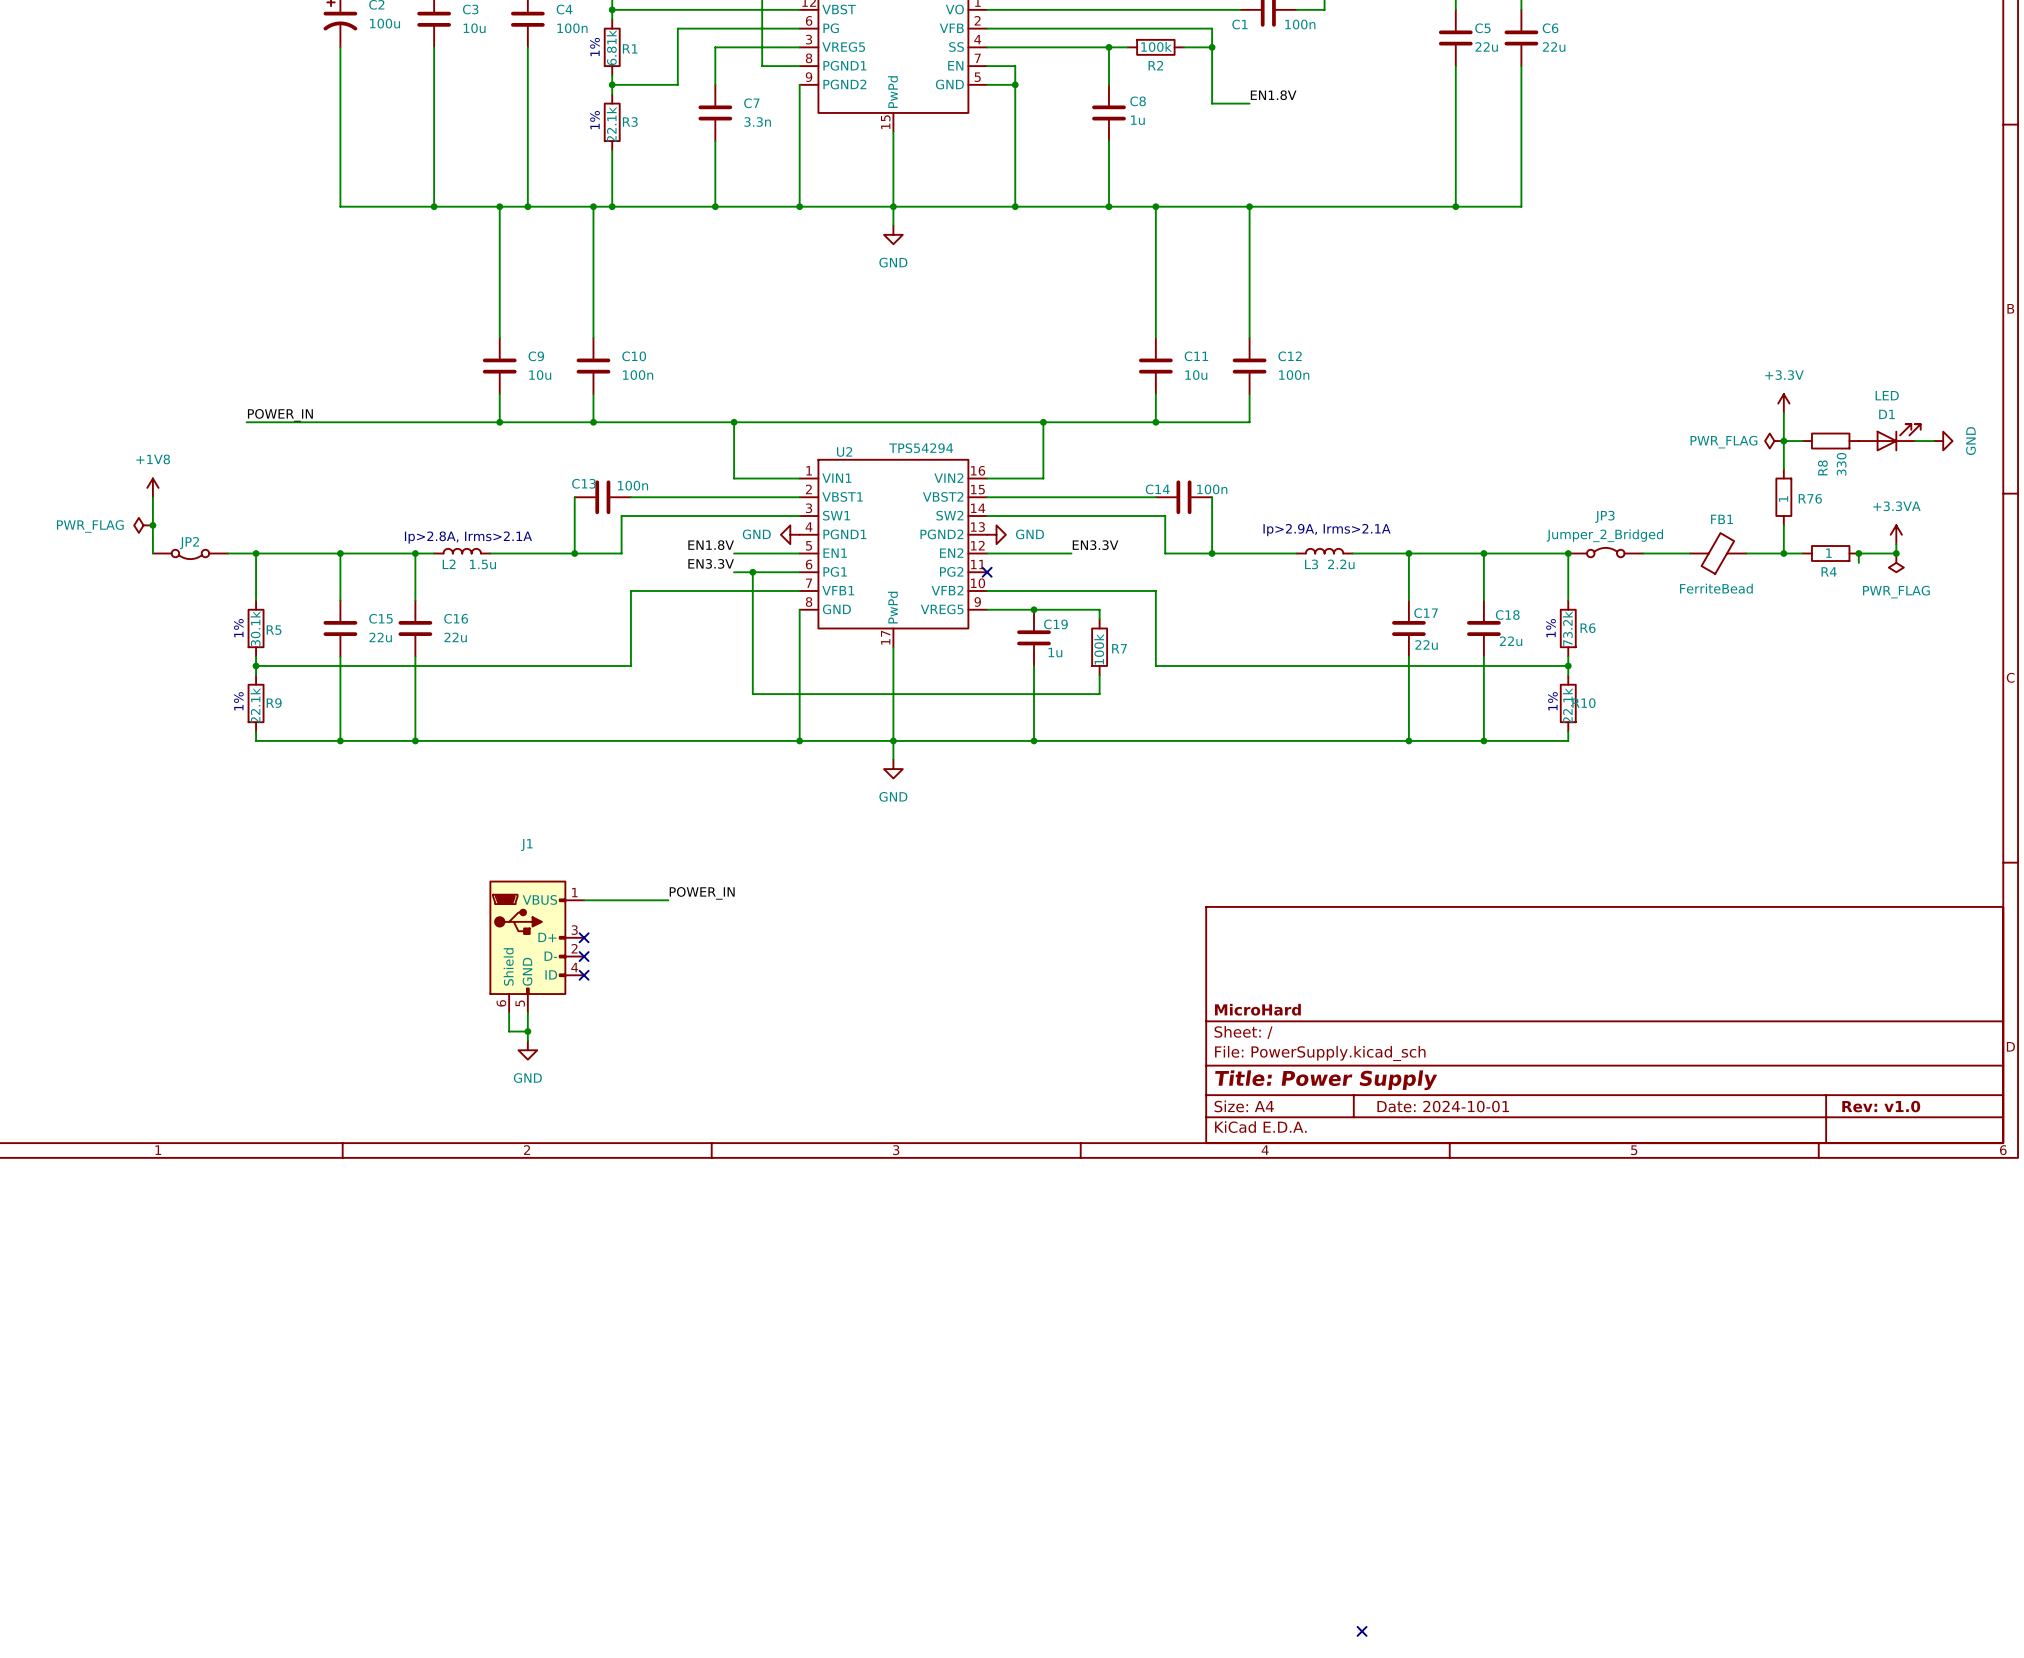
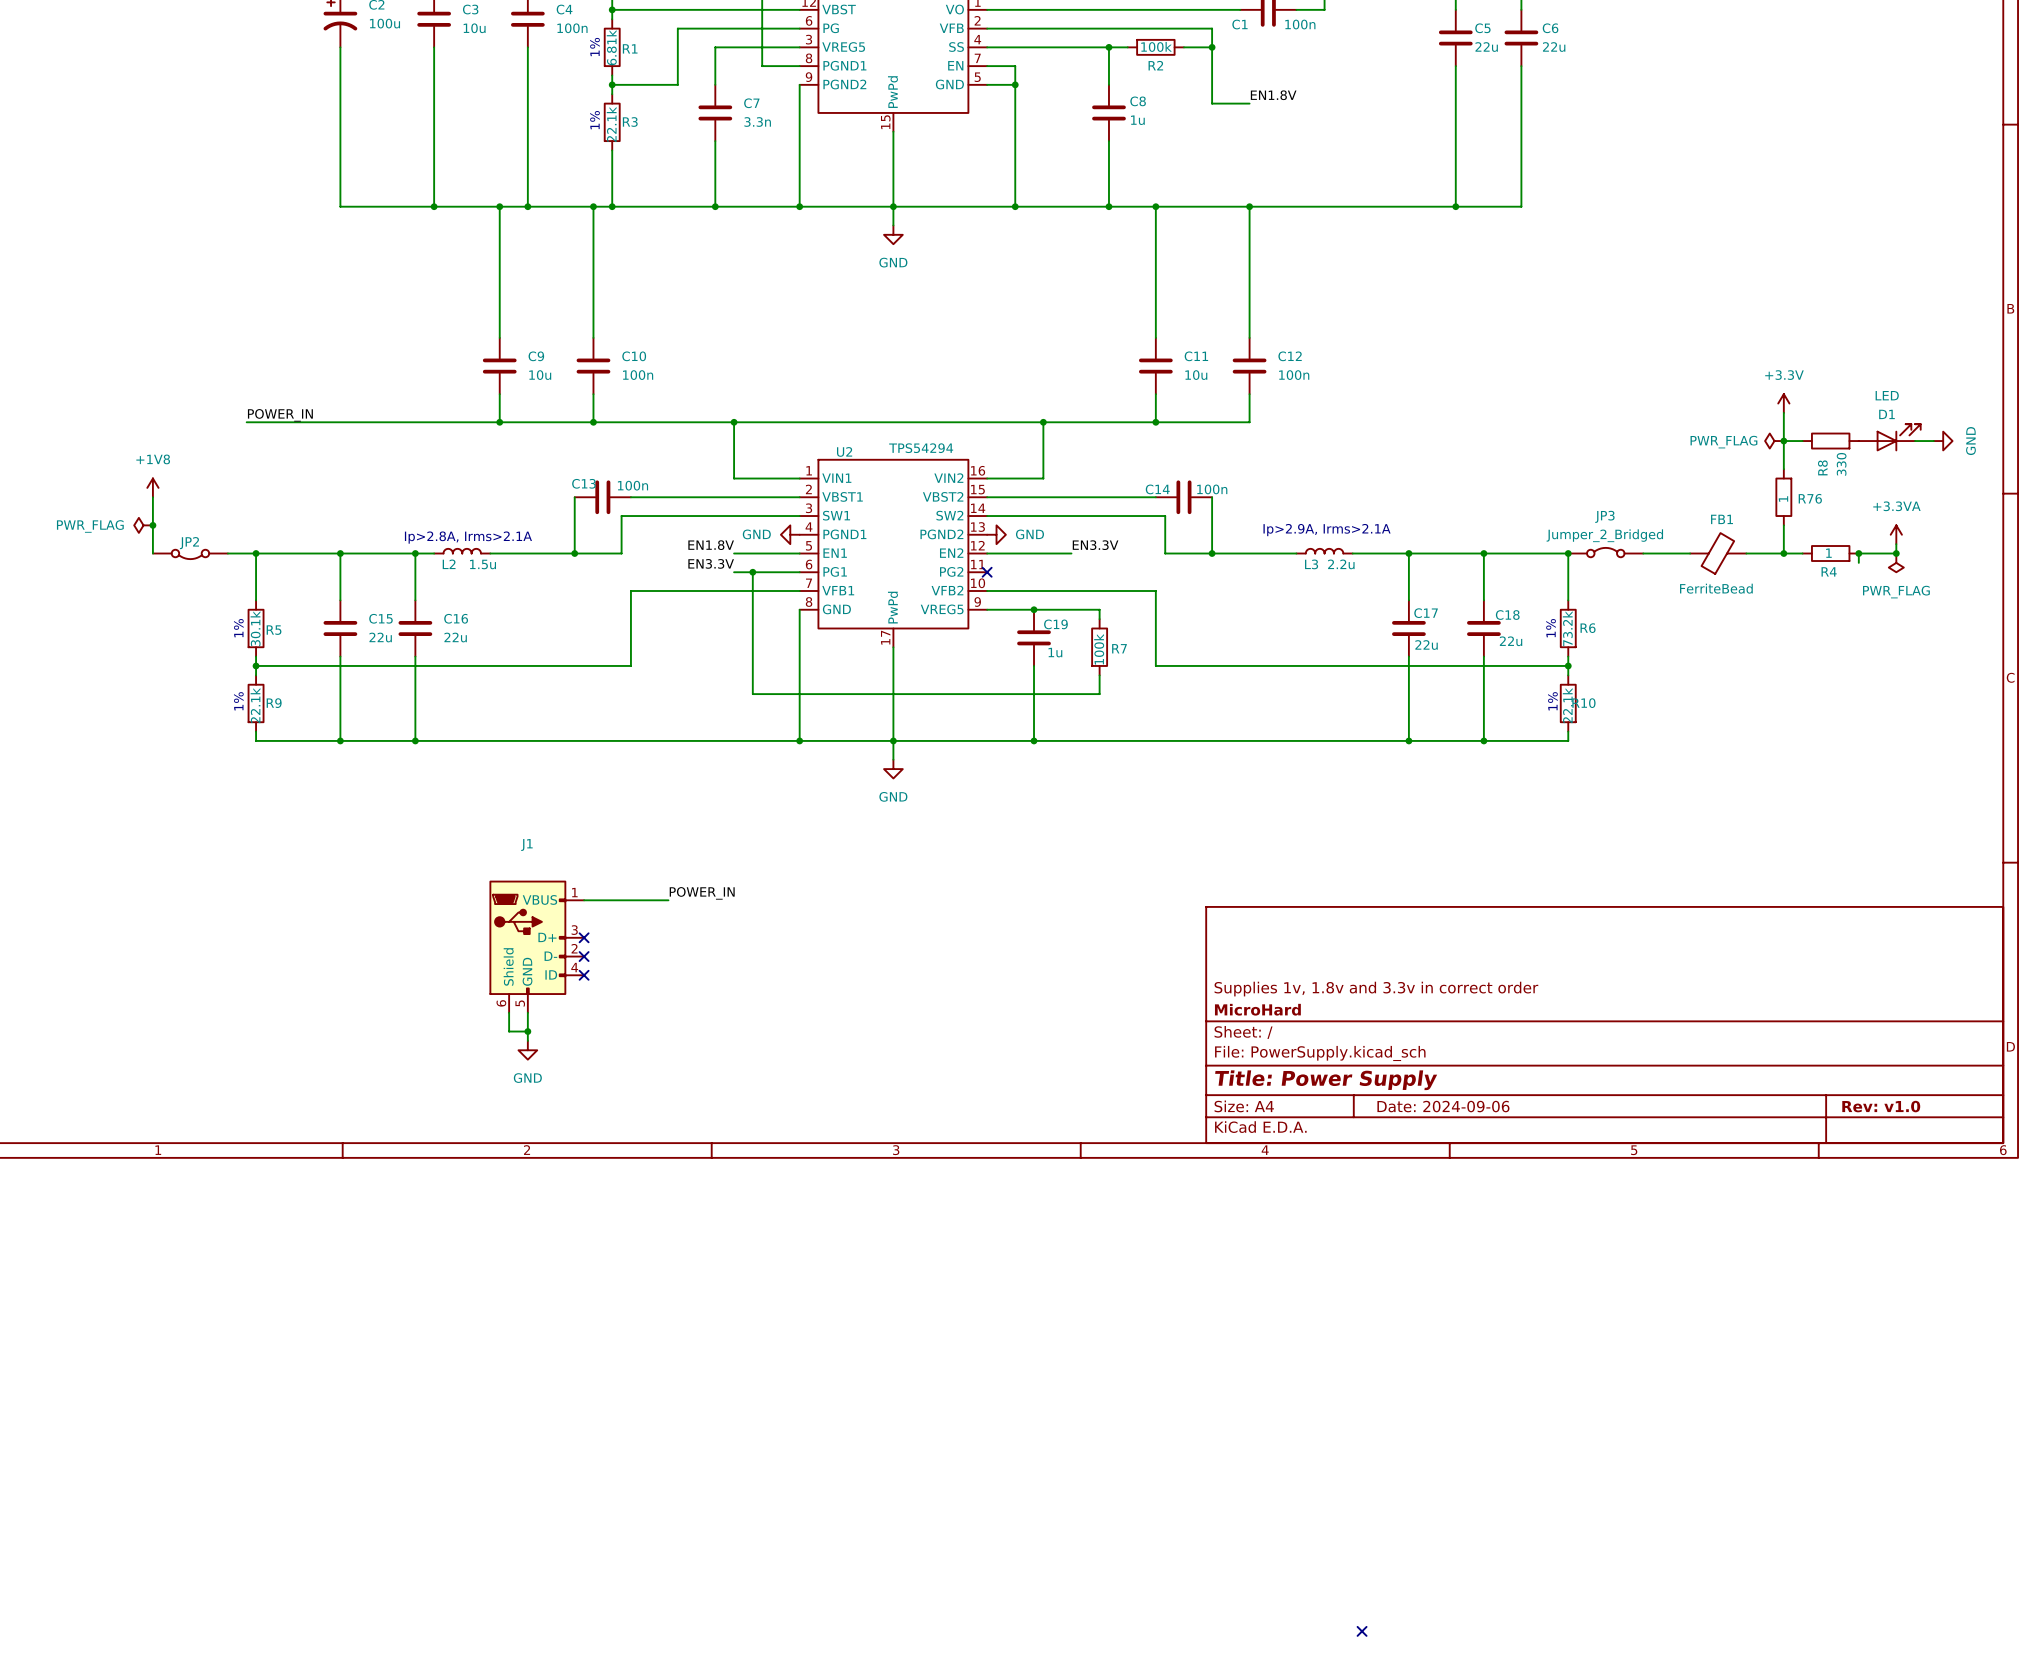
title block: none -> Supplies 1v, 1.8v and 3.3v in correct order (1376, 989)
title block: Date: 2024-10-01 (1443, 1106) -> Date: 2024-09-06 (1443, 1106)

